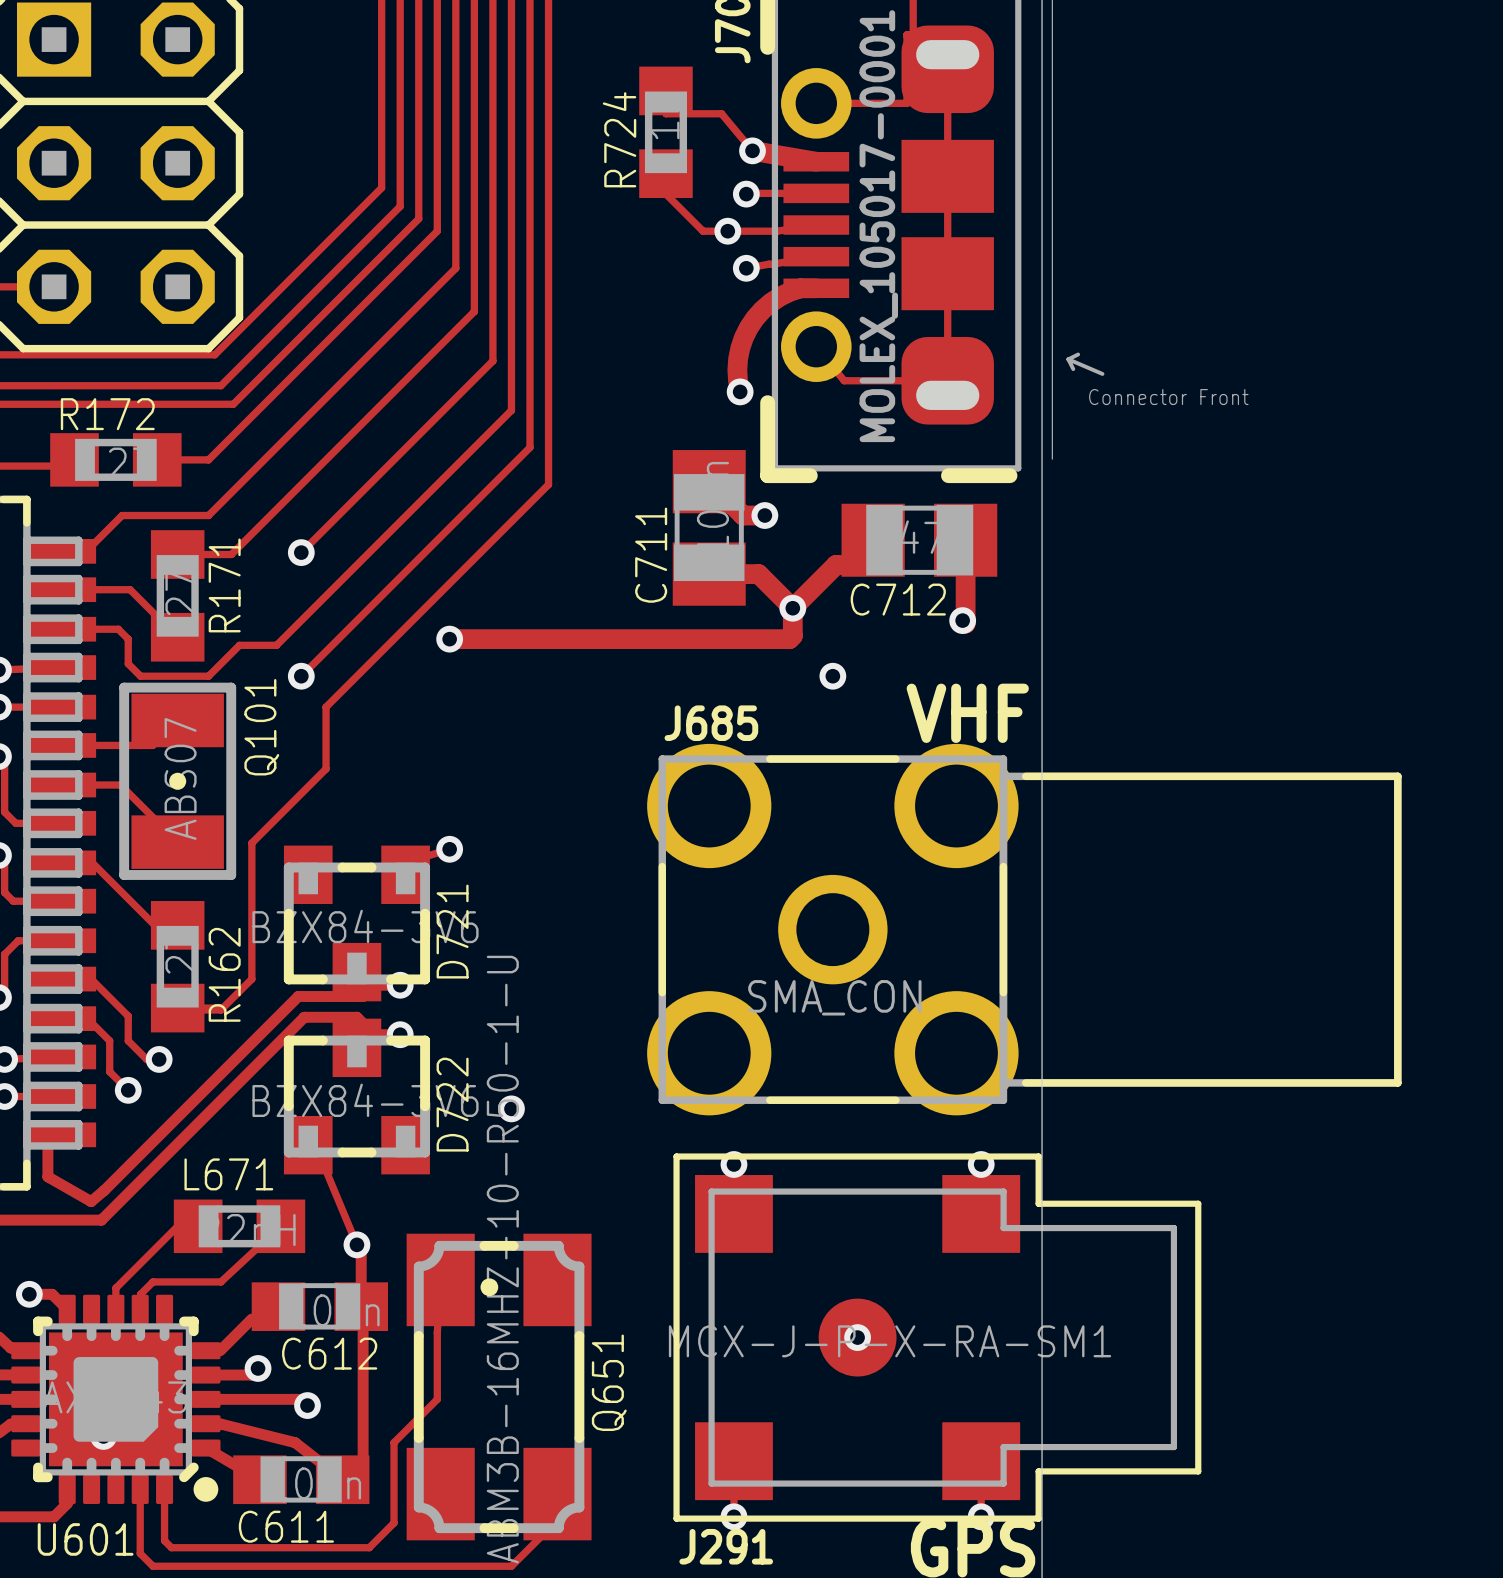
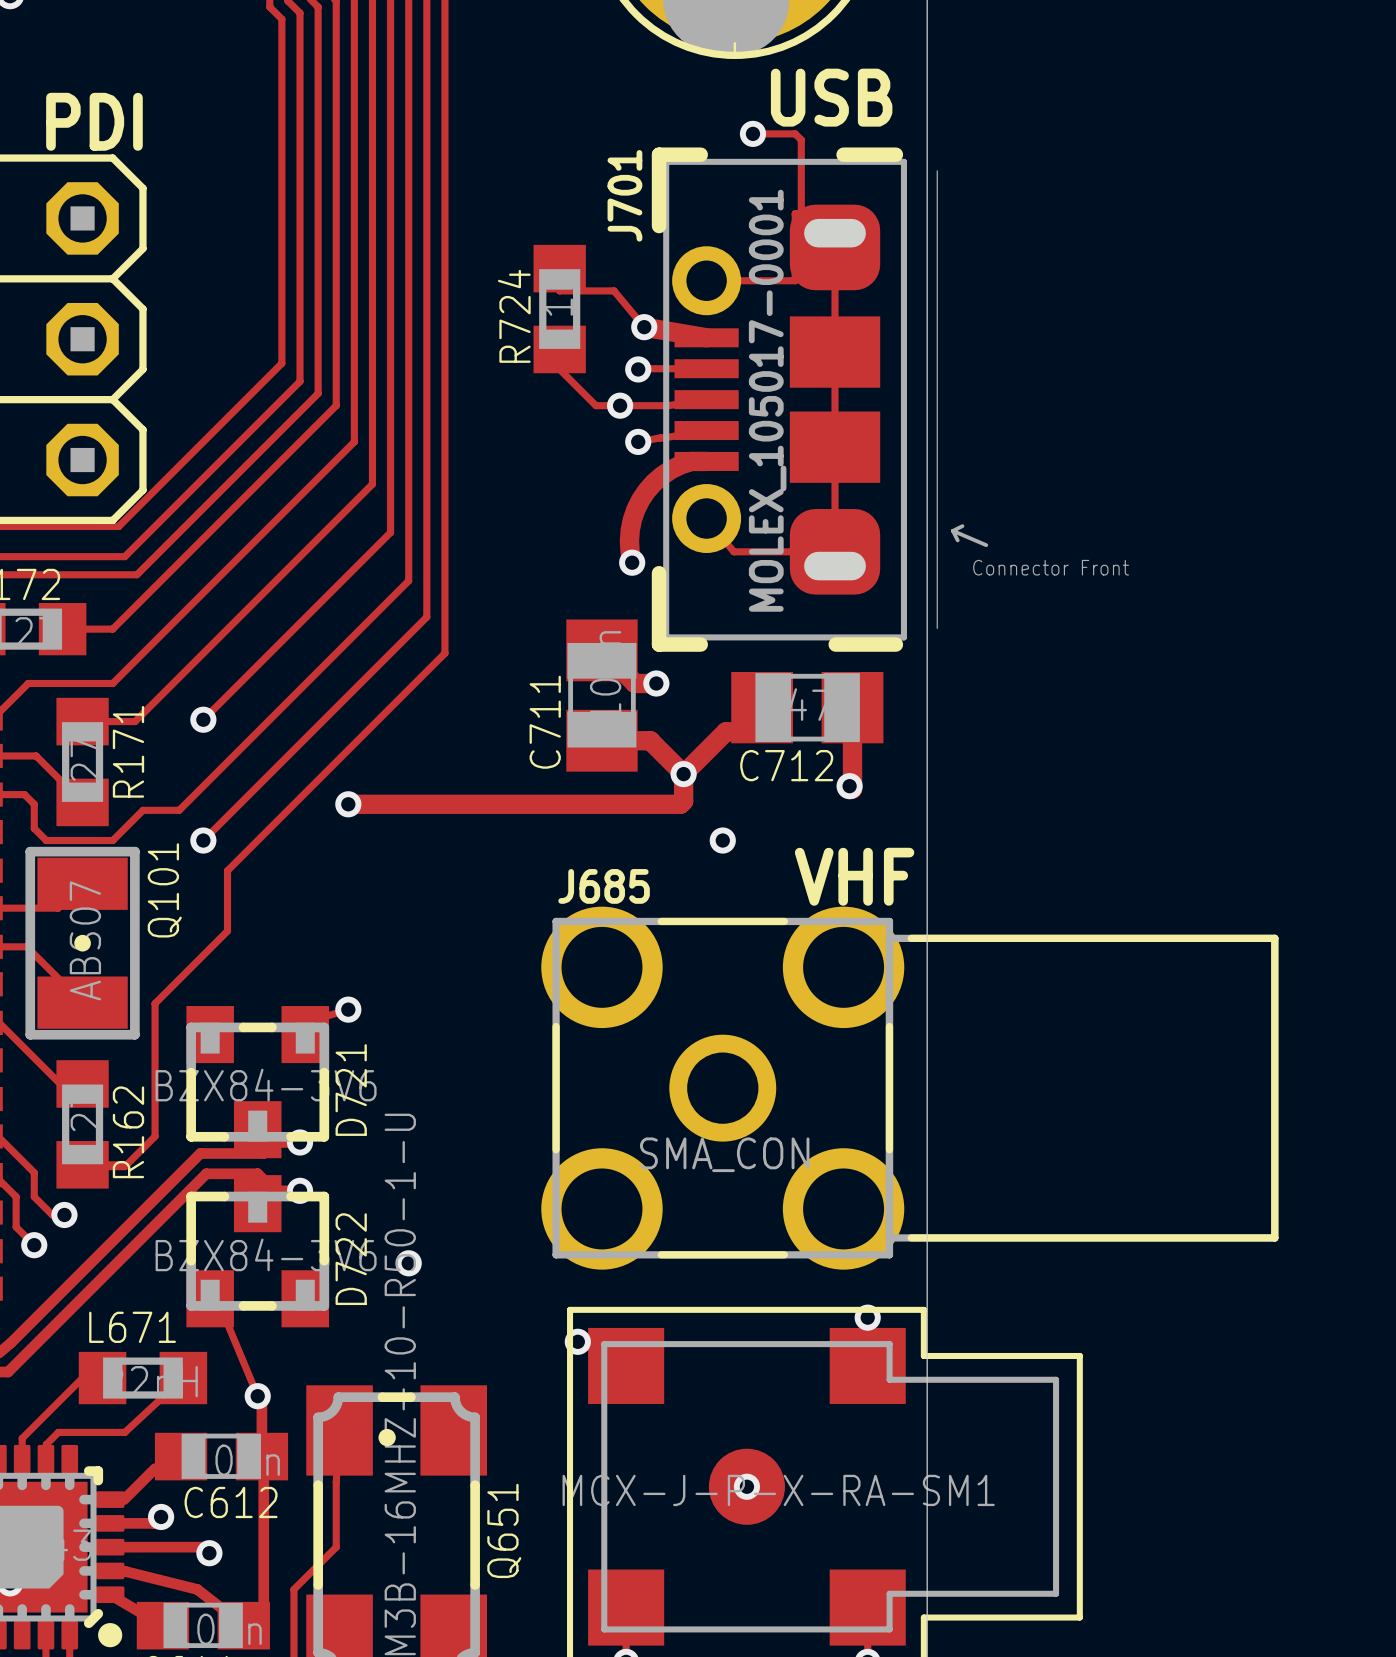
via position: (733, 1164) -> (577, 1341)

